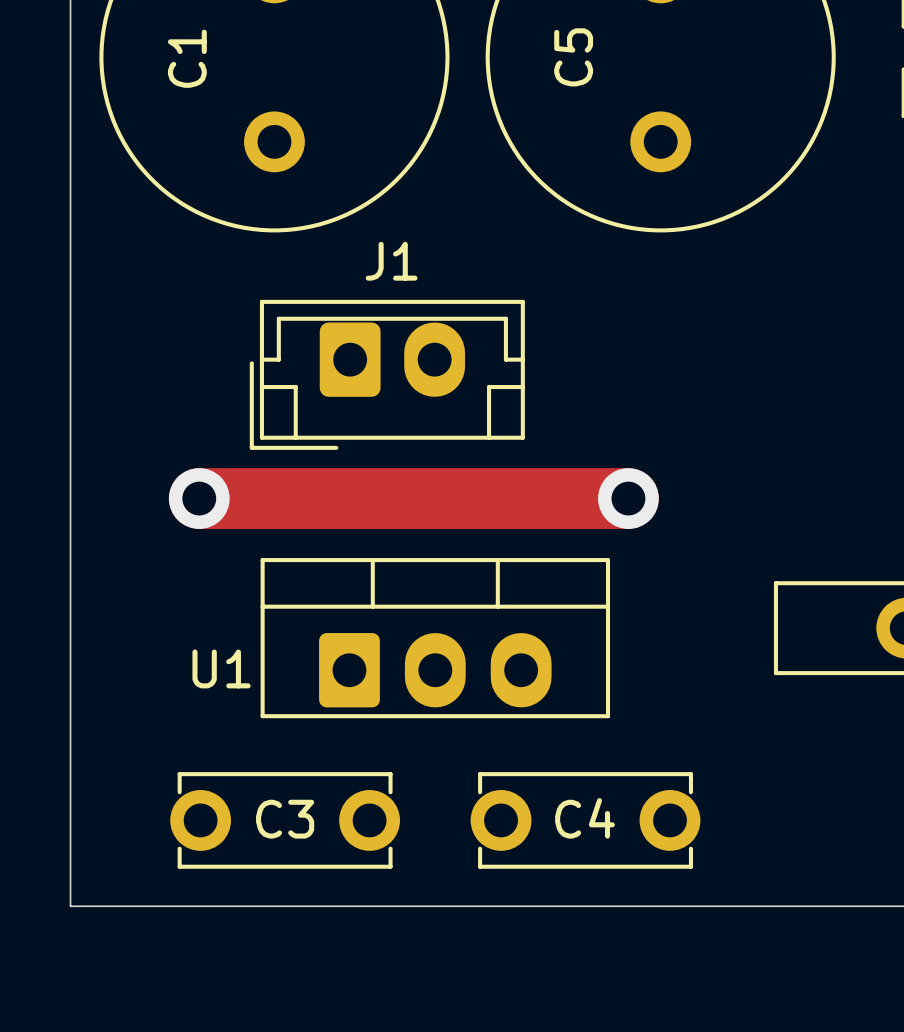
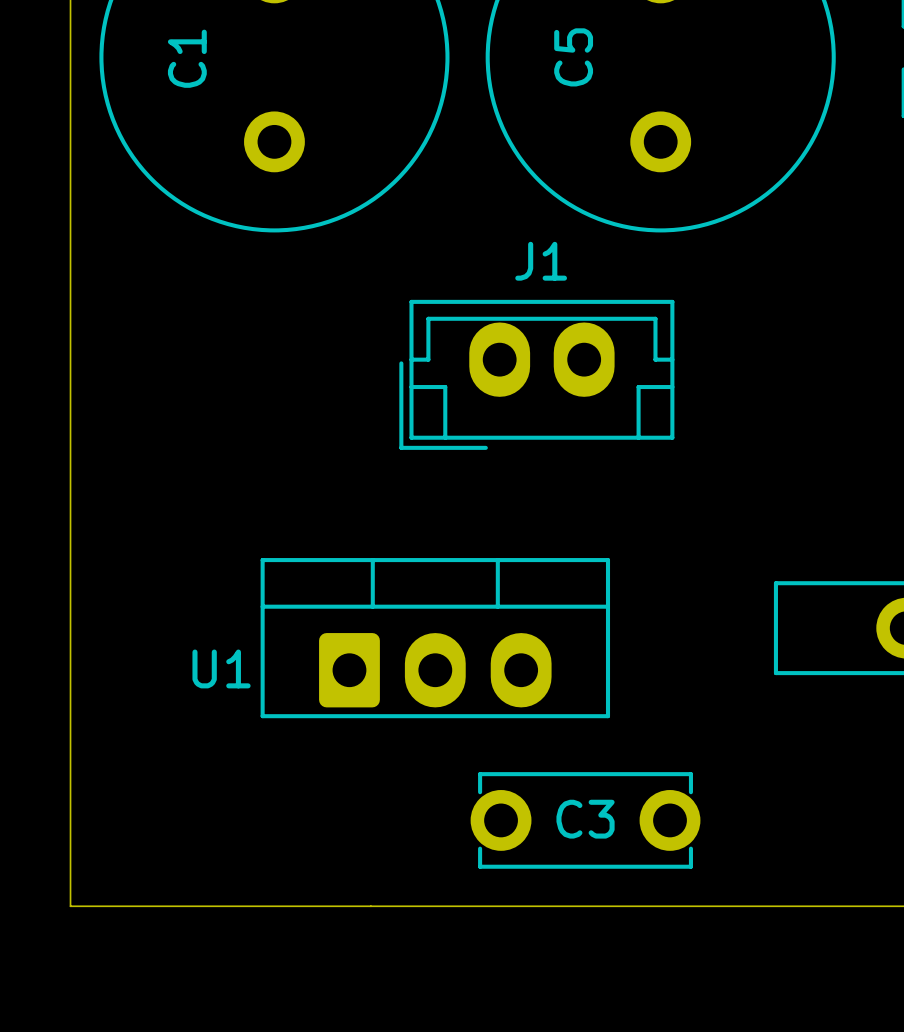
J1 footprint: [249, 299, 525, 450] -> [399, 299, 675, 450]
track: (199, 498) (628, 498) -> none
via: (199, 498) -> none
via: (628, 498) -> none
C4 name: C4 (584, 818) -> C3 (585, 819)
C3: (285, 820) -> none

